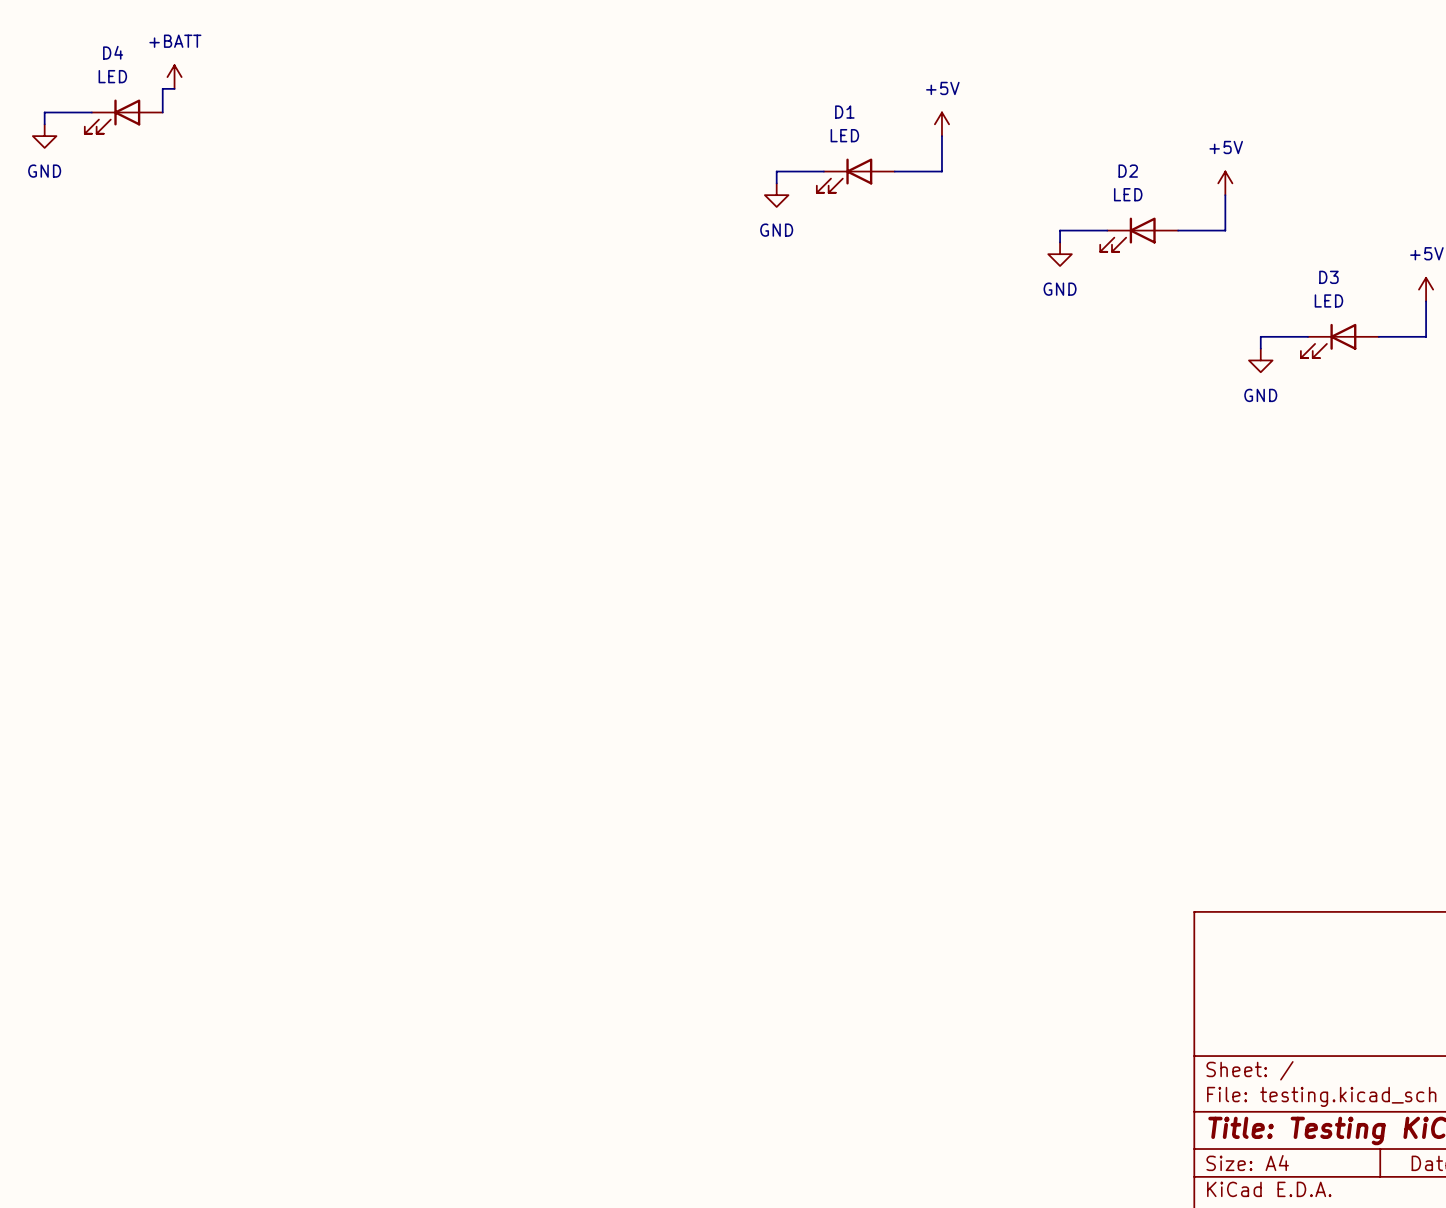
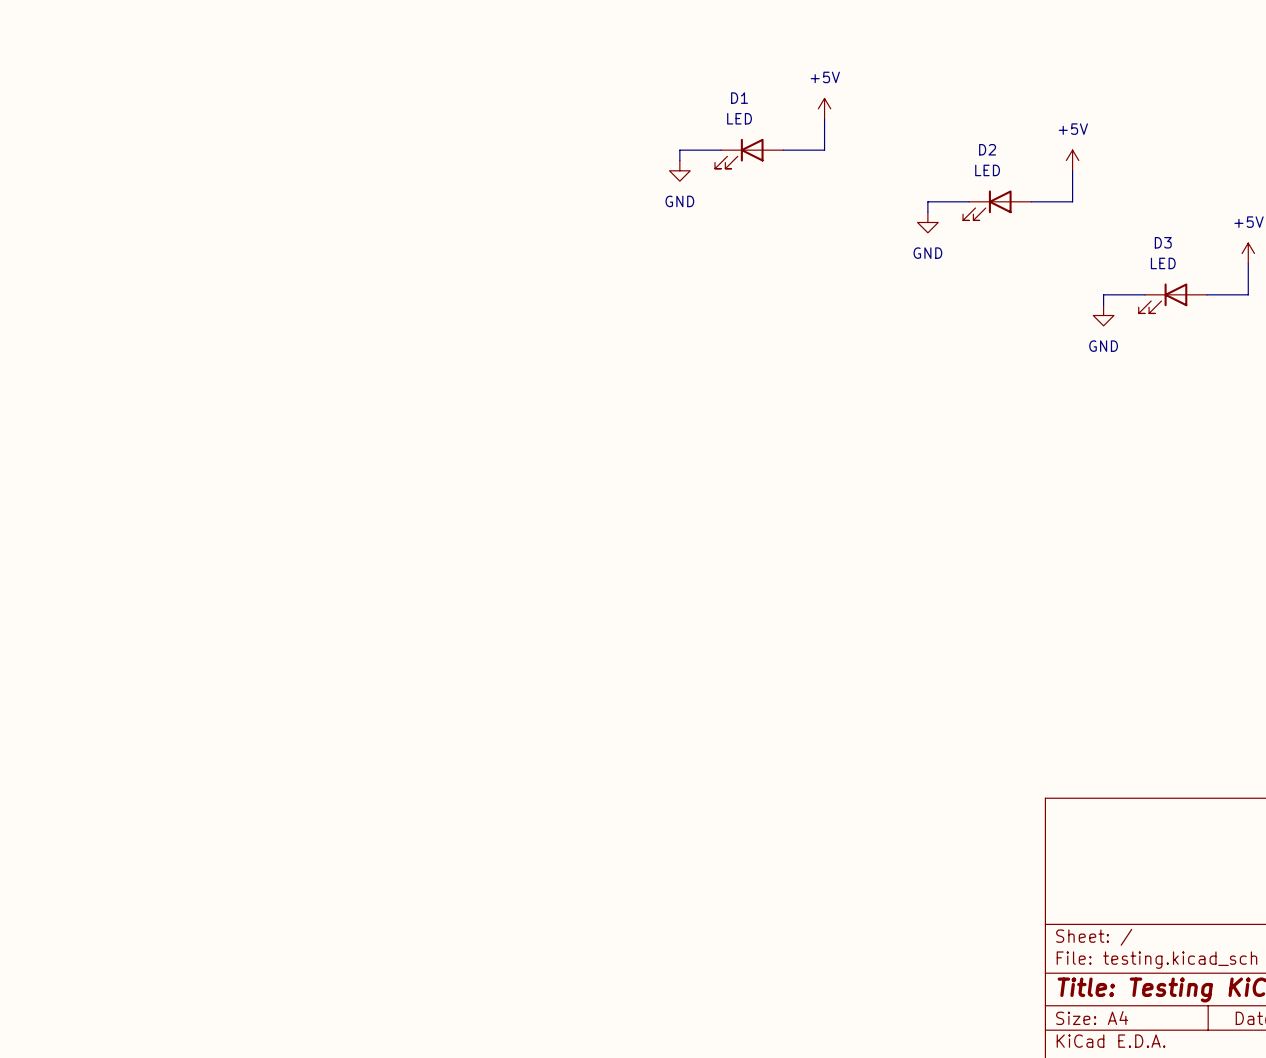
power symbol: +BATT (174, 77) -> none
wire: (174, 88) (162, 88) (162, 112) -> none
wire: (91, 112) (44, 112) (44, 124) -> none
D4: LED (123, 116) -> none
power symbol: GND (44, 136) -> none

